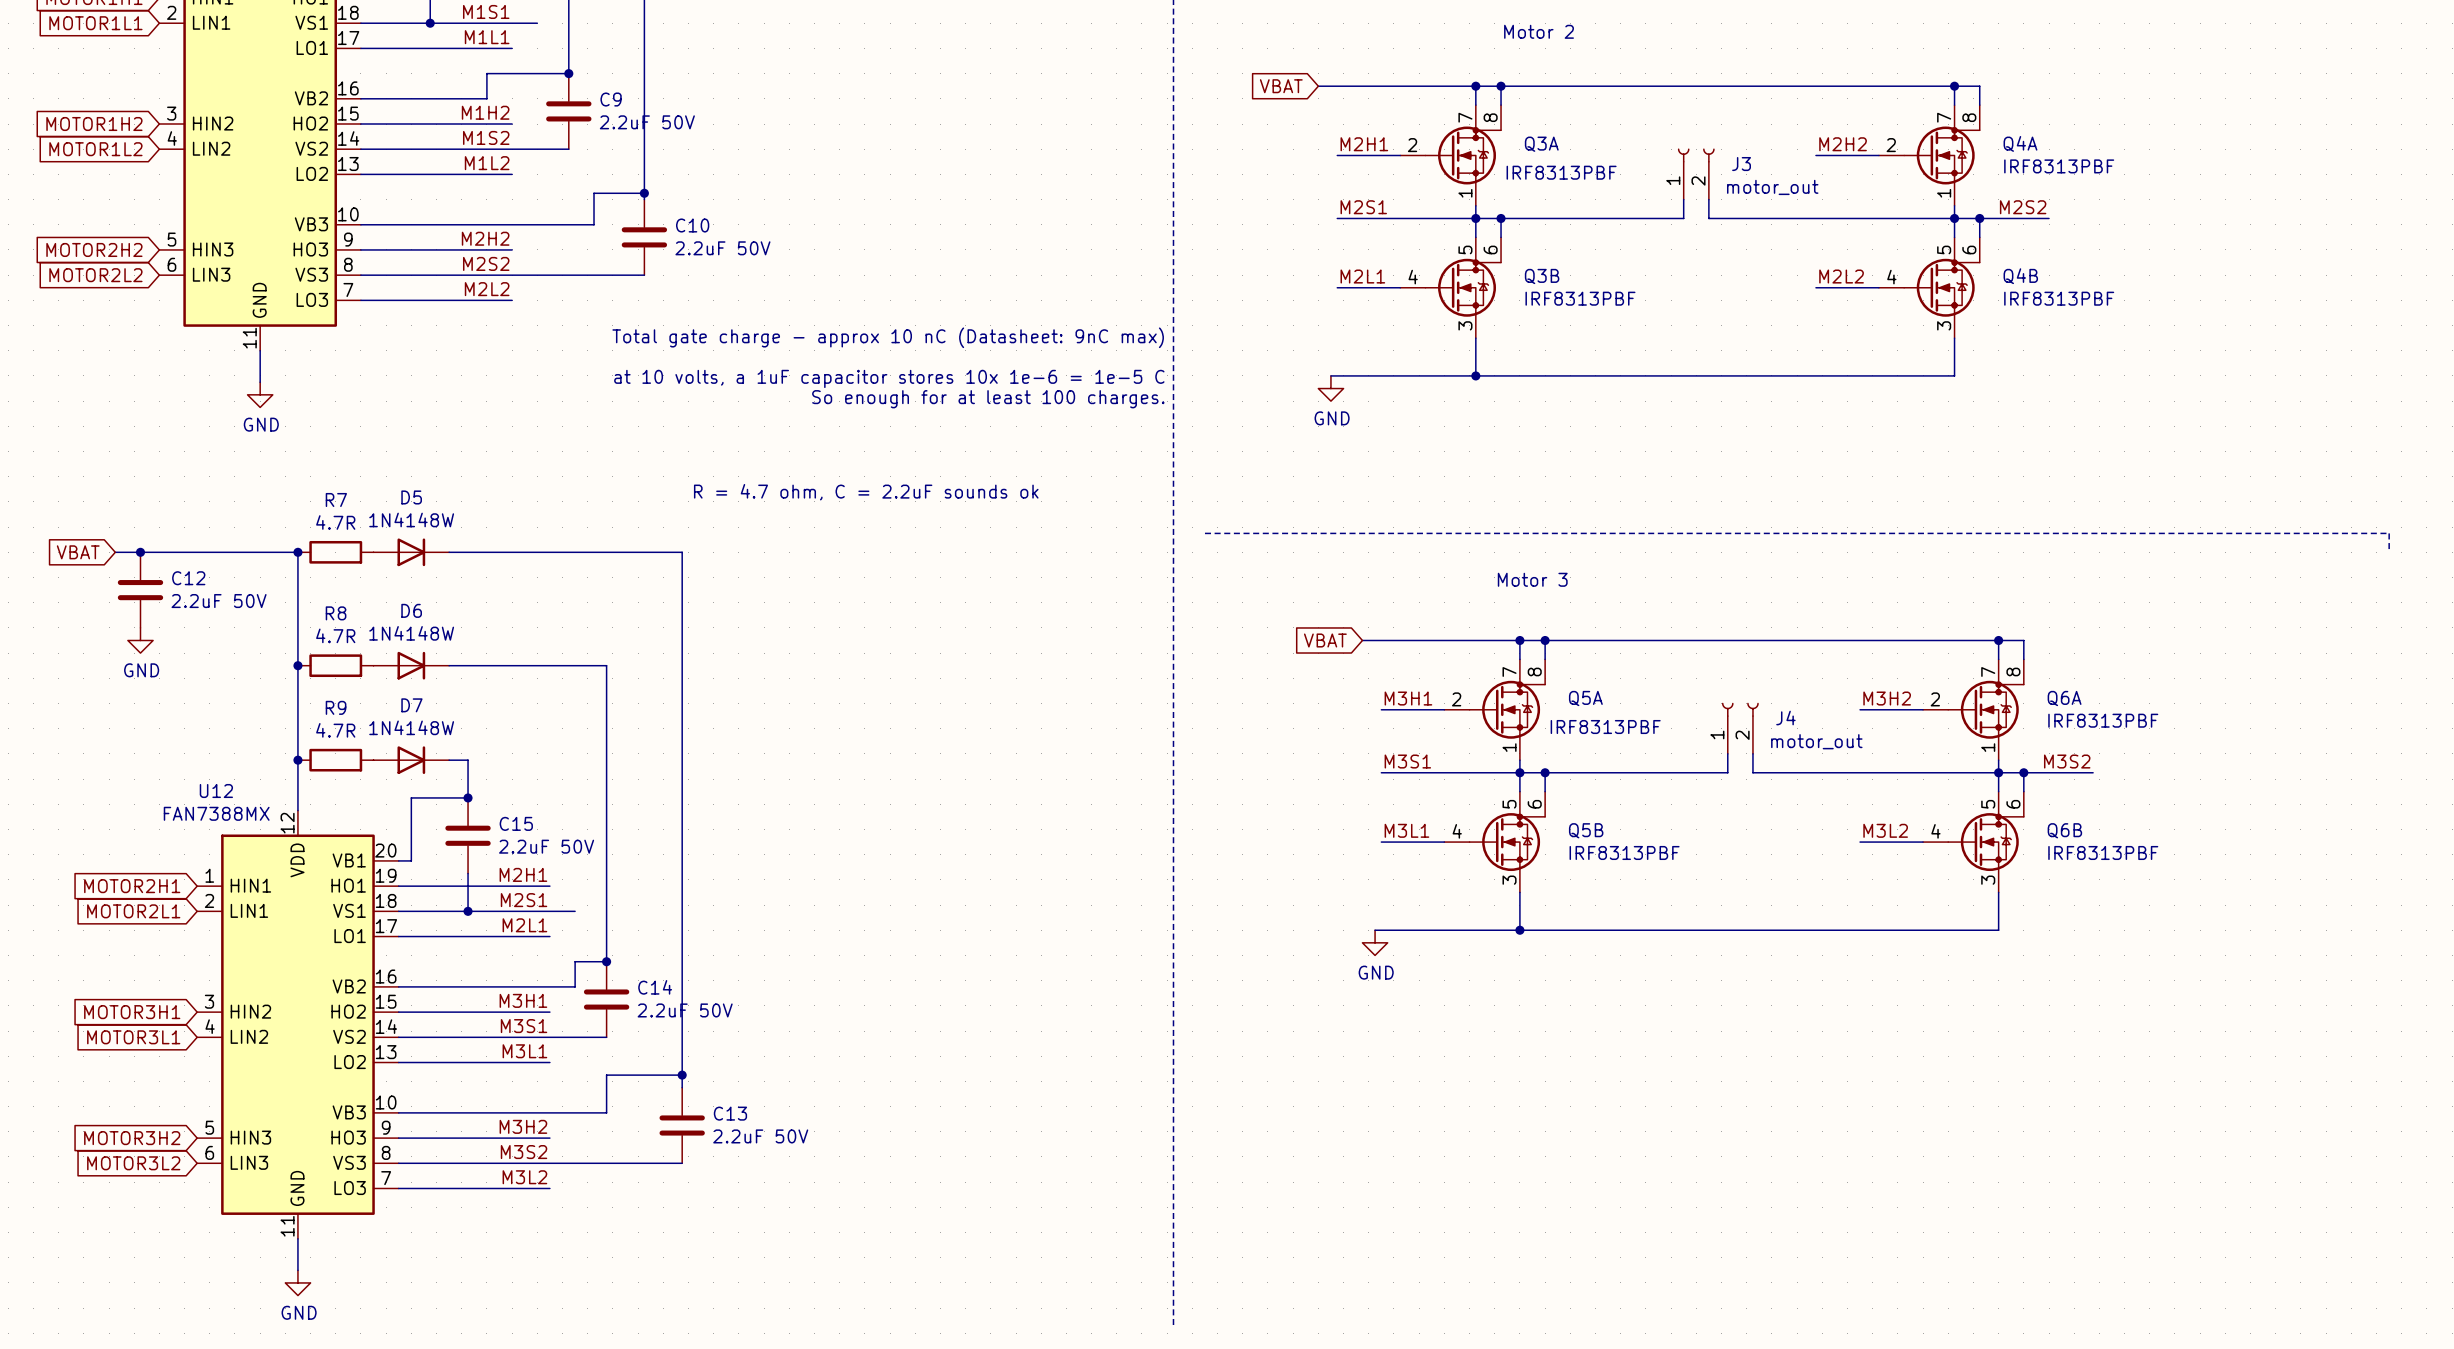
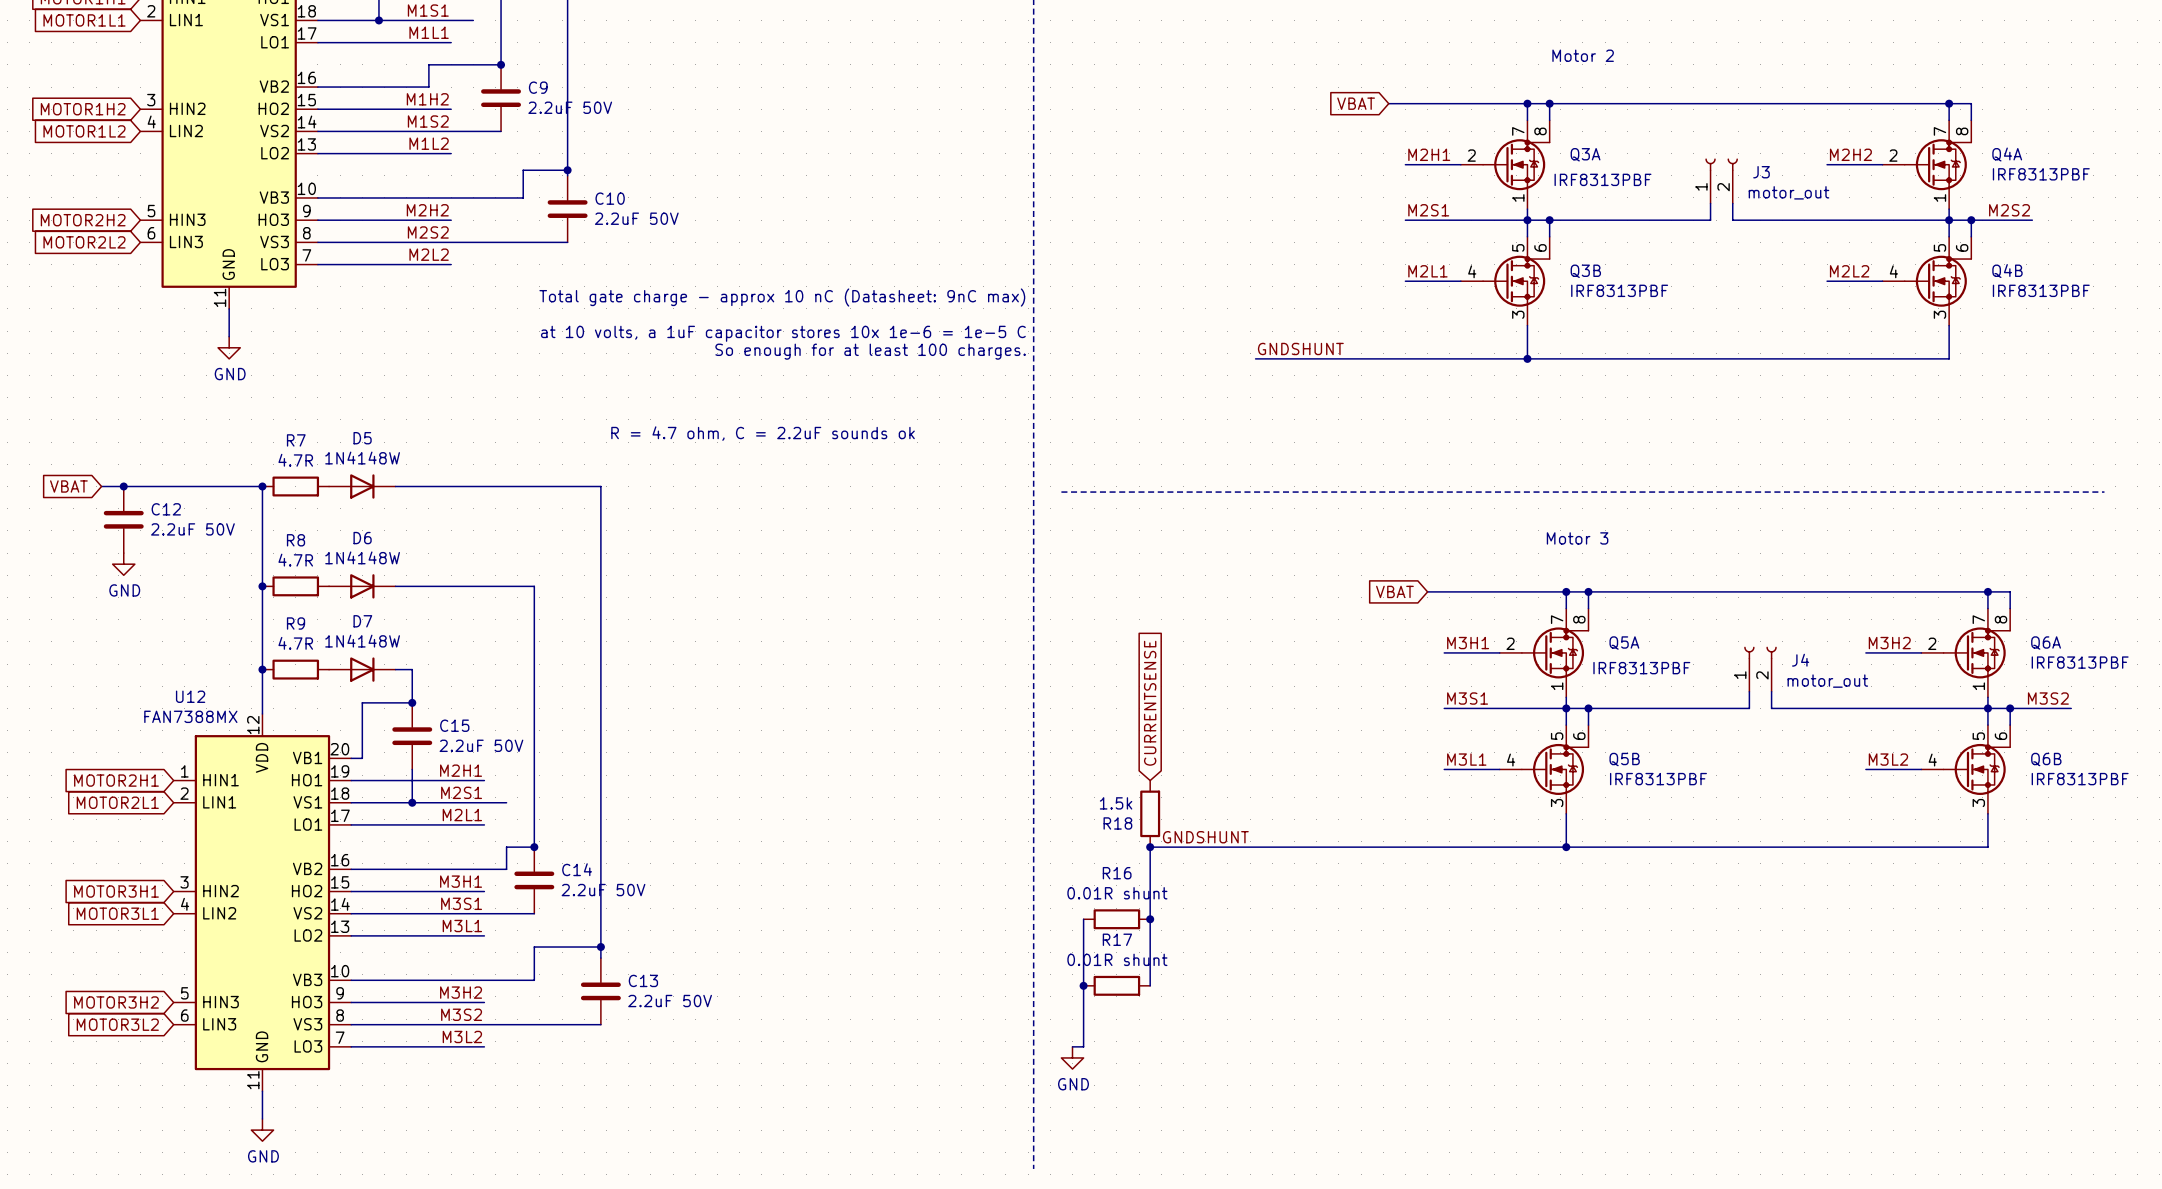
text: Motor 2 (1539, 31) -> none
text: none -> Motor 2 (1583, 55)
global label: VBAT (1281, 86) -> none
wire: (1318, 86) (1979, 86) (1979, 105) -> none
wire: (1475, 86) (1475, 105) -> none
junction: (1475, 86) -> none
wire: (1501, 86) (1501, 105) -> none
junction: (1501, 86) -> none
wire: (1954, 86) (1954, 105) -> (1527, 103) (1527, 120)
junction: (1954, 86) -> none
global label: none -> VBAT (1356, 103)
wire: none -> (1388, 103) (1971, 103) (1971, 120)
junction: none -> (1527, 103)
wire: none -> (1549, 103) (1549, 120)
junction: none -> (1549, 103)
wire: none -> (1949, 103) (1949, 120)
junction: none -> (1949, 103)
label: M2H1 (1364, 144) -> none
label: M2H2 (1843, 144) -> none
wire: (1337, 155) (1400, 155) -> none
Q3A position: (1450, 155) -> (1505, 164)
wire: (1815, 155) (1878, 155) -> (1405, 164) (1460, 164)
Q4A position: (1929, 155) -> (1926, 164)
J3 position: (1696, 174) -> (1721, 181)
label: none -> M2H1 (1429, 154)
label: none -> M2H2 (1850, 154)
wire: none -> (1827, 164) (1882, 164)
wire: (1683, 199) (1683, 218) (1337, 218) -> none
wire: (1708, 199) (1708, 218) (2049, 218) -> none
wire: (1475, 205) (1475, 237) -> none
wire: (1954, 205) (1954, 237) -> (1527, 209) (1527, 236)
label: M2S1 (1363, 207) -> none
label: M2S2 (2023, 207) -> none
junction: (1475, 218) -> none
wire: (1501, 218) (1501, 237) -> none
junction: (1501, 218) -> none
junction: (1954, 218) -> none
wire: (1979, 218) (1979, 237) -> (1549, 220) (1549, 236)
junction: (1979, 218) -> none
wire: none -> (1710, 203) (1710, 220) (1405, 220)
wire: none -> (1732, 203) (1732, 220) (2032, 220)
wire: none -> (1949, 209) (1949, 236)
label: none -> M2S1 (1428, 210)
label: none -> M2S2 (2009, 210)
junction: none -> (1527, 220)
junction: none -> (1549, 220)
junction: none -> (1949, 220)
wire: none -> (1971, 220) (1971, 236)
junction: none -> (1971, 220)
label: M2L1 (1362, 276) -> none
label: M2L2 (1841, 276) -> none
wire: (1337, 287) (1400, 287) -> none
Q3B position: (1450, 287) -> (1505, 281)
wire: (1815, 287) (1878, 287) -> (1405, 281) (1460, 281)
Q4B position: (1929, 287) -> (1926, 281)
label: none -> M2L1 (1427, 271)
label: none -> M2L2 (1849, 271)
wire: none -> (1827, 281) (1882, 281)
wire: (1475, 338) (1475, 375) -> none
wire: (1954, 338) (1954, 375) (1330, 375) -> none
wire: none -> (1527, 325) (1527, 358)
wire: none -> (1949, 325) (1949, 358) (1255, 358)
junction: (1475, 375) -> none
power symbol: GND (1330, 388) -> none
label: none -> GNDSHUNT (1300, 348)
junction: none -> (1527, 358)
line: (1204, 533) (2389, 533) (2389, 552) -> none
line: none -> (1061, 492) (2104, 492)
text: Motor 3 (1532, 579) -> none
text: none -> Motor 3 (1577, 538)
global label: VBAT (1325, 640) -> none
wire: (1362, 640) (2023, 640) (2023, 659) -> none
wire: (1519, 640) (1519, 659) -> none
junction: (1519, 640) -> none
wire: (1545, 640) (1545, 659) -> none
junction: (1545, 640) -> none
wire: (1998, 640) (1998, 659) -> (1566, 591) (1566, 608)
junction: (1998, 640) -> none
global label: none -> VBAT (1394, 591)
wire: none -> (1427, 591) (2010, 591) (2010, 608)
junction: none -> (1566, 591)
wire: none -> (1588, 591) (1588, 608)
junction: none -> (1588, 591)
wire: none -> (1987, 591) (1987, 608)
junction: none -> (1987, 591)
label: M3H1 (1408, 698) -> none
label: M3H2 (1887, 698) -> none
wire: (1381, 709) (1444, 709) -> none
Q5A position: (1494, 709) -> (1544, 652)
wire: (1860, 709) (1923, 709) -> (1444, 652) (1499, 652)
Q6A position: (1973, 709) -> (1965, 652)
J4 position: (1740, 728) -> (1760, 669)
label: none -> M3H1 (1468, 643)
label: none -> M3H2 (1889, 643)
wire: none -> (1865, 652) (1921, 652)
wire: (1727, 753) (1727, 772) (1381, 772) -> none
wire: (1752, 753) (1752, 772) (2093, 772) -> none
wire: (1519, 760) (1519, 791) -> none
wire: (1998, 760) (1998, 791) -> (1566, 697) (1566, 725)
label: M3S1 (1407, 761) -> none
label: M3S2 (2067, 761) -> none
junction: (1519, 772) -> none
wire: (1545, 772) (1545, 791) -> none
junction: (1545, 772) -> none
junction: (1998, 772) -> none
wire: (2023, 772) (2023, 791) -> (1588, 708) (1588, 725)
junction: (2023, 772) -> none
wire: none -> (1749, 691) (1749, 708) (1444, 708)
wire: none -> (1771, 691) (1771, 708) (2071, 708)
wire: none -> (1987, 697) (1987, 725)
label: none -> M3S1 (1467, 698)
label: none -> M3S2 (2048, 698)
global label: none -> CURRENTSENSE (1150, 703)
junction: none -> (1566, 708)
junction: none -> (1588, 708)
junction: none -> (1987, 708)
wire: none -> (2010, 708) (2010, 725)
junction: none -> (2010, 708)
label: M3L1 (1406, 830) -> none
label: M3L2 (1885, 830) -> none
wire: (1381, 842) (1444, 842) -> none
Q5B position: (1494, 842) -> (1544, 769)
wire: (1860, 842) (1923, 842) -> (1444, 769) (1499, 769)
Q6B position: (1973, 842) -> (1965, 769)
label: none -> M3L1 (1466, 759)
label: none -> M3L2 (1888, 759)
wire: none -> (1865, 769) (1921, 769)
wire: (1519, 892) (1519, 930) -> none
wire: (1998, 892) (1998, 930) (1375, 930) -> none
R18: none -> 1.5k (1150, 813)
wire: none -> (1566, 813) (1566, 847)
wire: none -> (1987, 813) (1987, 847) (1150, 847) (1150, 985)
junction: (1519, 930) -> none
power symbol: GND (1375, 942) -> none
label: none -> GNDSHUNT (1205, 837)
junction: none -> (1150, 847)
junction: none -> (1566, 847)
wire: none -> (1083, 919) (1083, 1046) (1072, 1046)
R16: none -> 0.01R shunt (1116, 919)
junction: none -> (1150, 919)
junction: none -> (1083, 985)
R17: none -> 0.01R shunt (1116, 985)
power symbol: none -> GND (1072, 1057)

